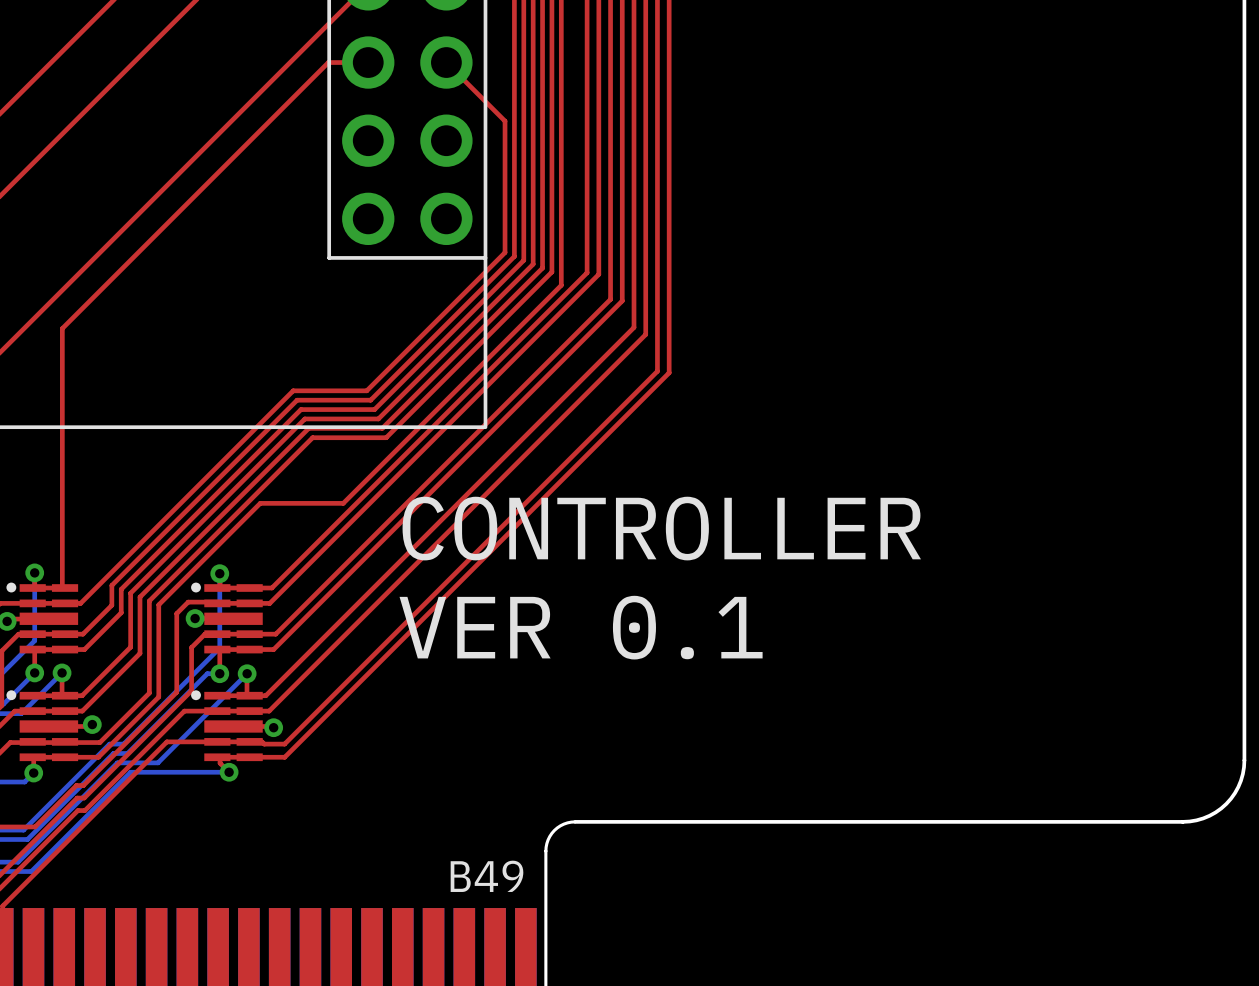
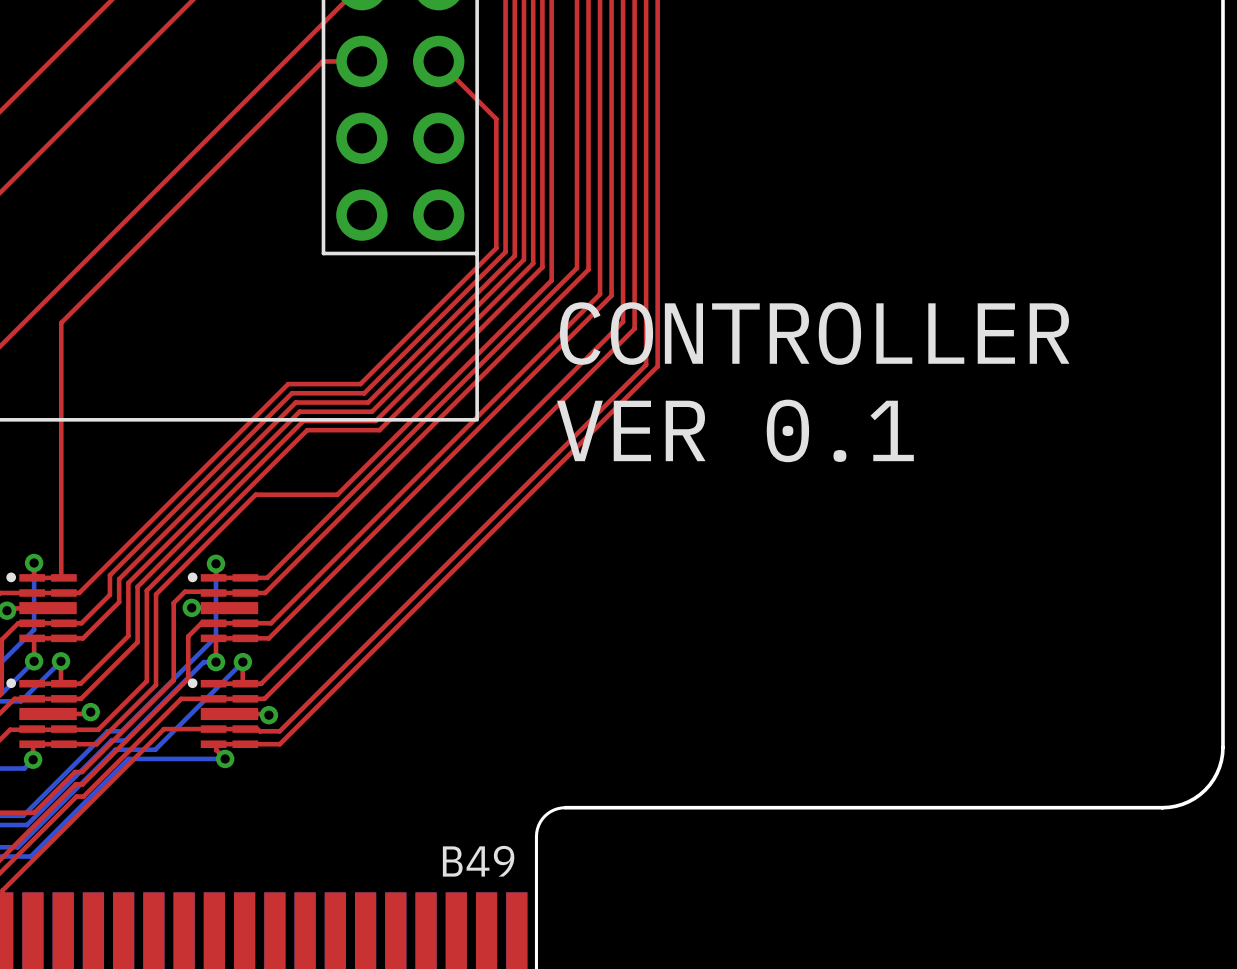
text position: CONTROLLER (661, 528) -> CONTROLLER (814, 333)
text position: VER 0.1 (581, 627) -> VER 0.1 (735, 430)

